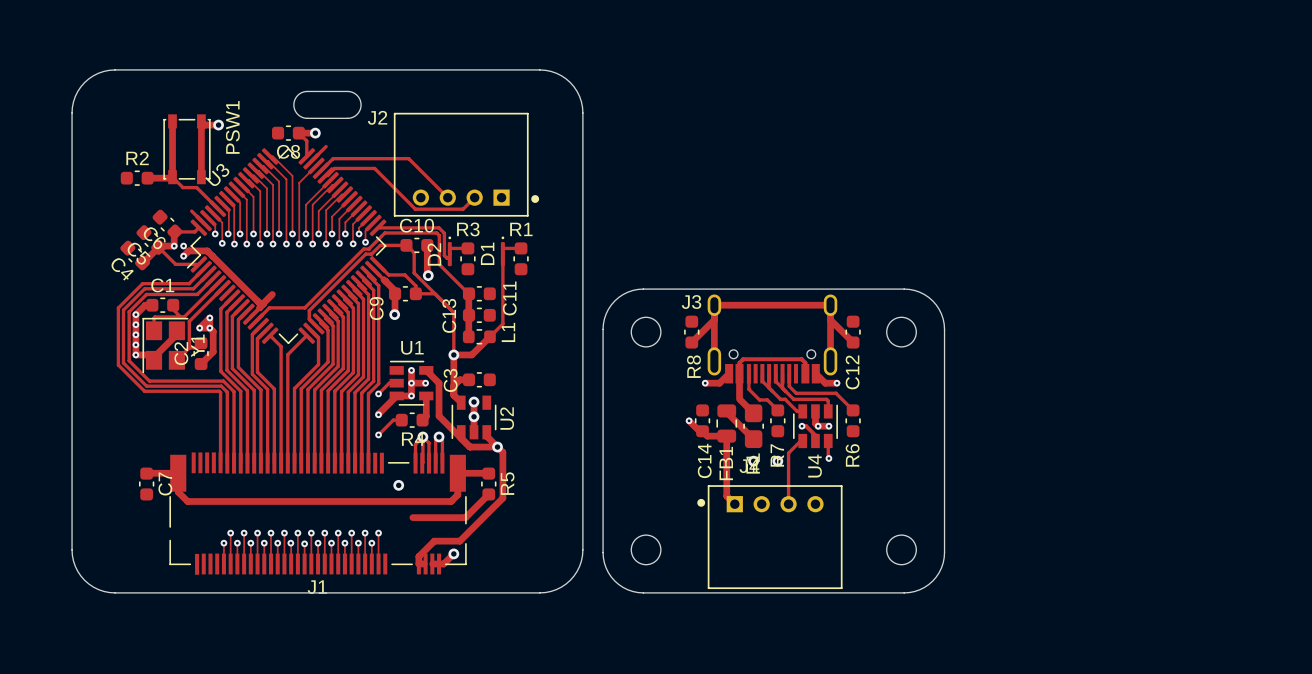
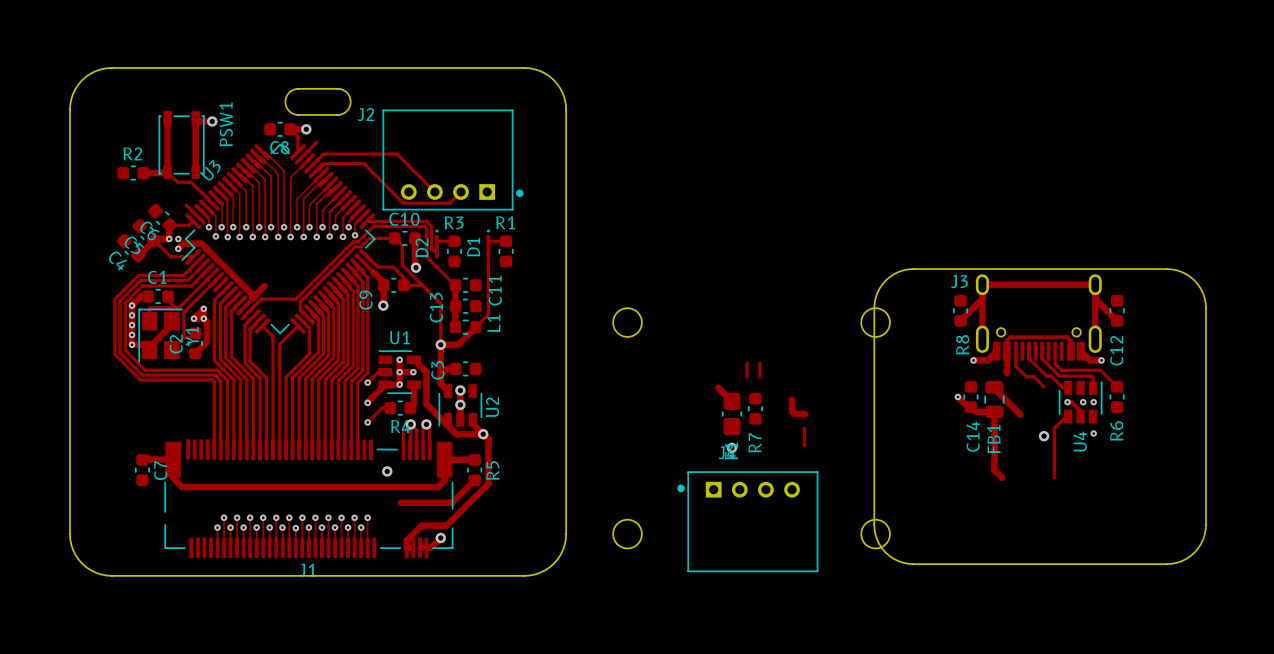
board edge: (643, 289) (904, 289) (919, 292) (932, 300) (941, 313) (944, 329) (944, 552) (941, 568) (932, 581) (919, 589) (904, 592) (643, 592) (627, 589) (614, 581) (606, 568) (603, 552) (603, 324) (608, 309) (618, 297) (632, 290) (643, 289) -> (913, 269) (1166, 269) (1181, 272) (1194, 280) (1202, 293) (1205, 308) (1205, 524) (1202, 539) (1194, 552) (1181, 561) (1166, 564) (913, 564) (898, 561) (885, 552) (877, 539) (874, 524) (874, 303) (879, 288) (889, 277) (903, 270) (913, 269)
track: (714, 319) (691, 342) -> (982, 298) (960, 320)
track: (830, 319) (853, 342) -> (1095, 298) (1117, 320)
R8 position: (691, 332) -> (960, 310)
C12 position: (853, 332) -> (1117, 310)
J3 position: (772, 338) -> (1038, 317)
track: (714, 361) (714, 305) (830, 305) (830, 361) -> (982, 339) (982, 284) (1095, 284) (1095, 339)
via: none -> (973, 360)
via: none -> (1101, 360)
track: (729, 373) (719, 383) (705, 383) -> (996, 351) (987, 360) (973, 360)
track: (748, 373) (748, 389) (759, 399) (767, 399) (777, 410) -> (1015, 351) (1015, 366) (1026, 376) (1033, 376) (1044, 386)
track: (762, 373) (762, 381) (780, 399) (785, 399) (797, 411) (802, 411) -> (1029, 351) (1029, 358) (1046, 376) (1051, 376) (1062, 387) (1068, 387)
track: (775, 373) (775, 381) (793, 399) (826, 399) (828, 411) -> (1042, 351) (1042, 358) (1059, 376) (1091, 376) (1093, 387)
track: (789, 373) (789, 386) (796, 393) (835, 393) (853, 410) -> (1055, 351) (1055, 363) (1061, 370) (1100, 370) (1117, 386)
track: (805, 373) (805, 362) (801, 359) (743, 359) (739, 362) (739, 396) -> (1070, 351) (1070, 340) (1067, 337) (1010, 337) (1006, 340) (1006, 373)
track: (815, 373) (825, 383) (836, 383) -> (1080, 351) (1090, 360) (1101, 360)
via: (705, 383) -> none
via: (836, 383) -> none
via: none -> (957, 396)
track: (726, 410) (753, 439) -> (994, 387) (1020, 414)
via: none -> (1067, 402)
via: none -> (1083, 402)
via: none -> (1093, 402)
track: (689, 420) (707, 436) (726, 436) (726, 496) (734, 504) -> (957, 396) (975, 411) (994, 411) (994, 470) (1002, 477)
via: (689, 420) -> none
C14 position: (702, 420) -> (970, 396)
R6 position: (853, 420) -> (1117, 396)
FB1 position: (726, 423) -> (994, 399)
track: (802, 426) (806, 426) (815, 435) (815, 440) -> (1067, 402) (1071, 402) (1080, 411) (1080, 416)
via: (802, 426) -> none
U4 position: (815, 426) -> (1080, 402)
via: (818, 426) -> none
via: (828, 426) -> none
track: (802, 440) (788, 453) (788, 504) -> (1068, 416) (1054, 428) (1054, 477)
via: none -> (1093, 433)
via: none -> (1044, 436)
via: (828, 458) -> none
via: (777, 461) -> none

